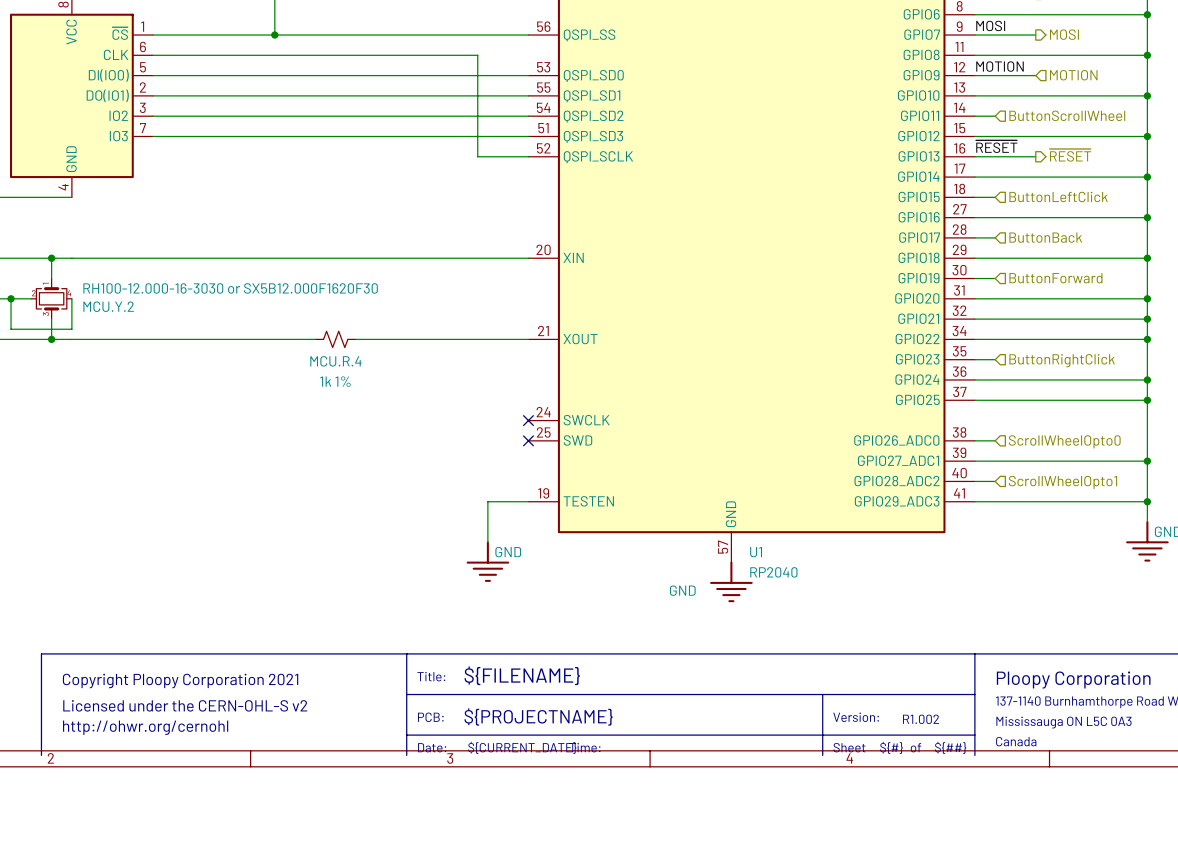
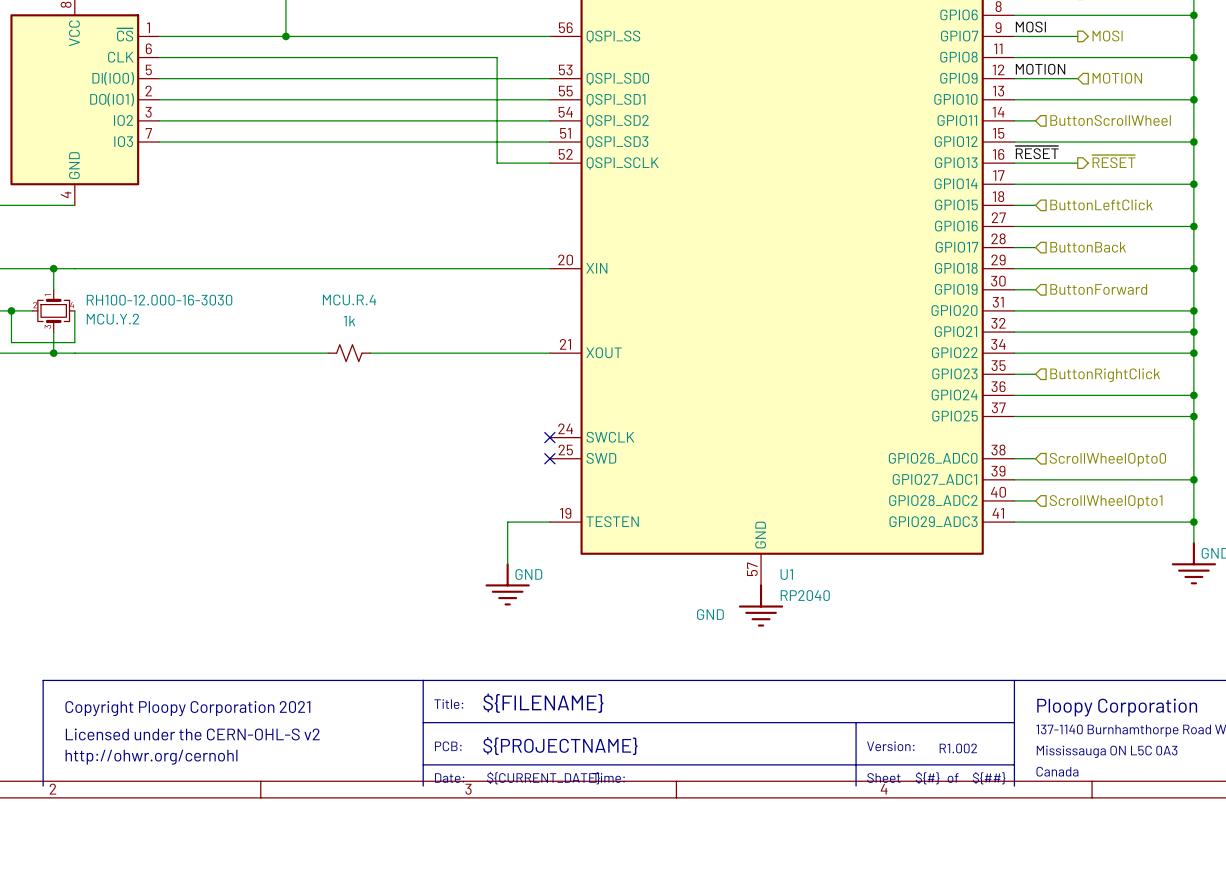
MCU.Y.2 value: RH100-12.000-16-3030 or SX5B12.000F1620F30 (230, 288) -> RH100-12.000-16-3030 (159, 300)
MCU.R.4 name position: MCU.R.4 (335, 361) -> MCU.R.4 (349, 299)
MCU.R.4 value: 1k 1% (335, 381) -> 1k (349, 321)

